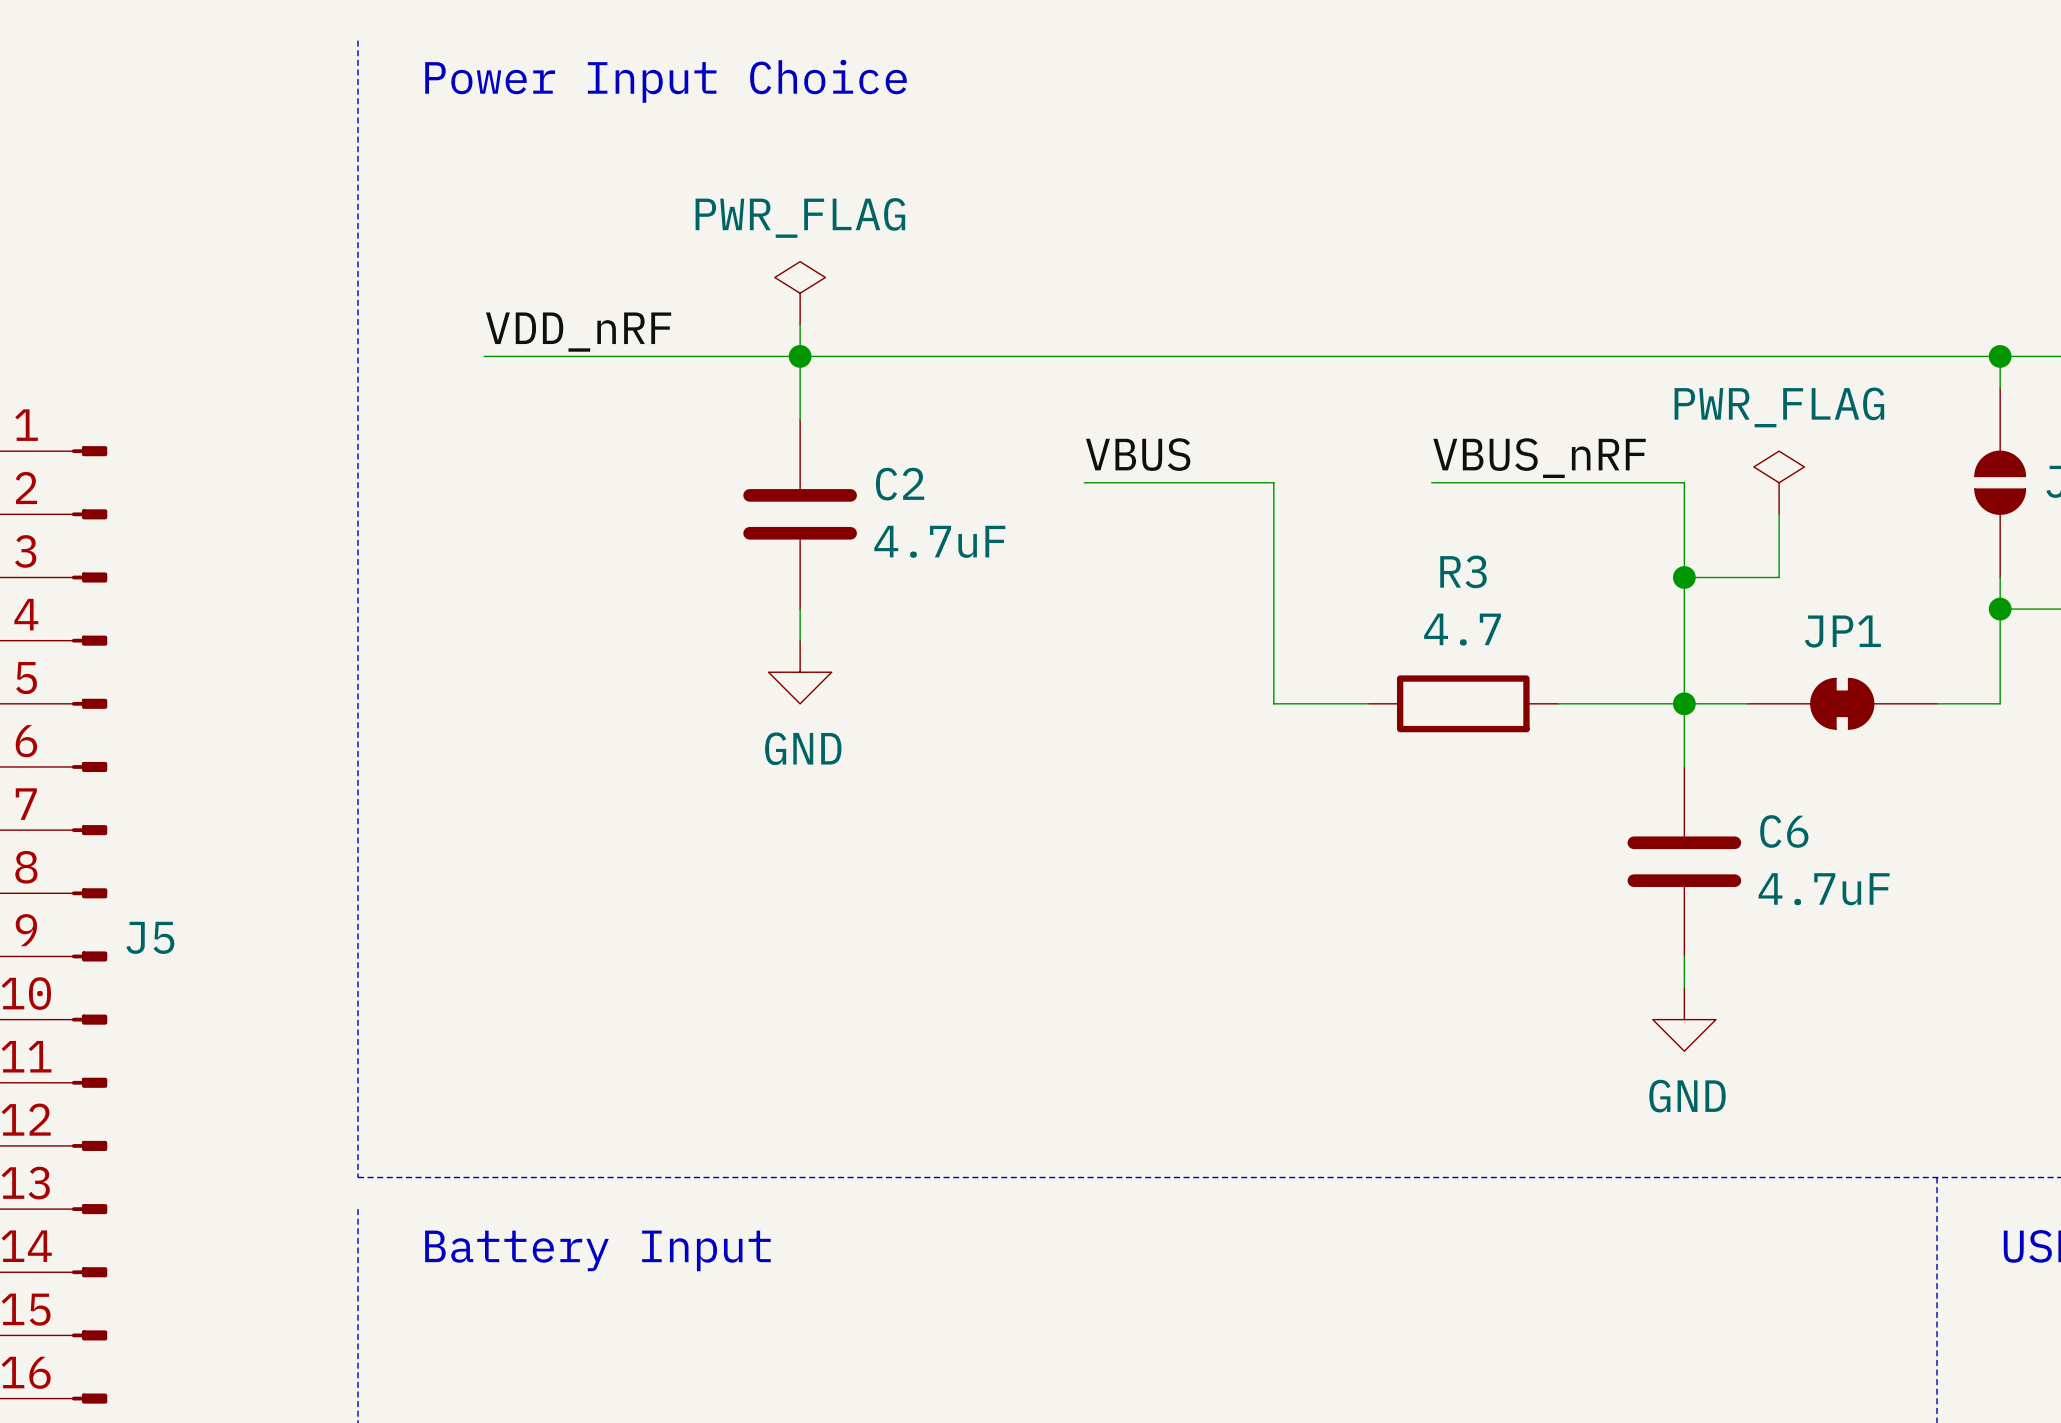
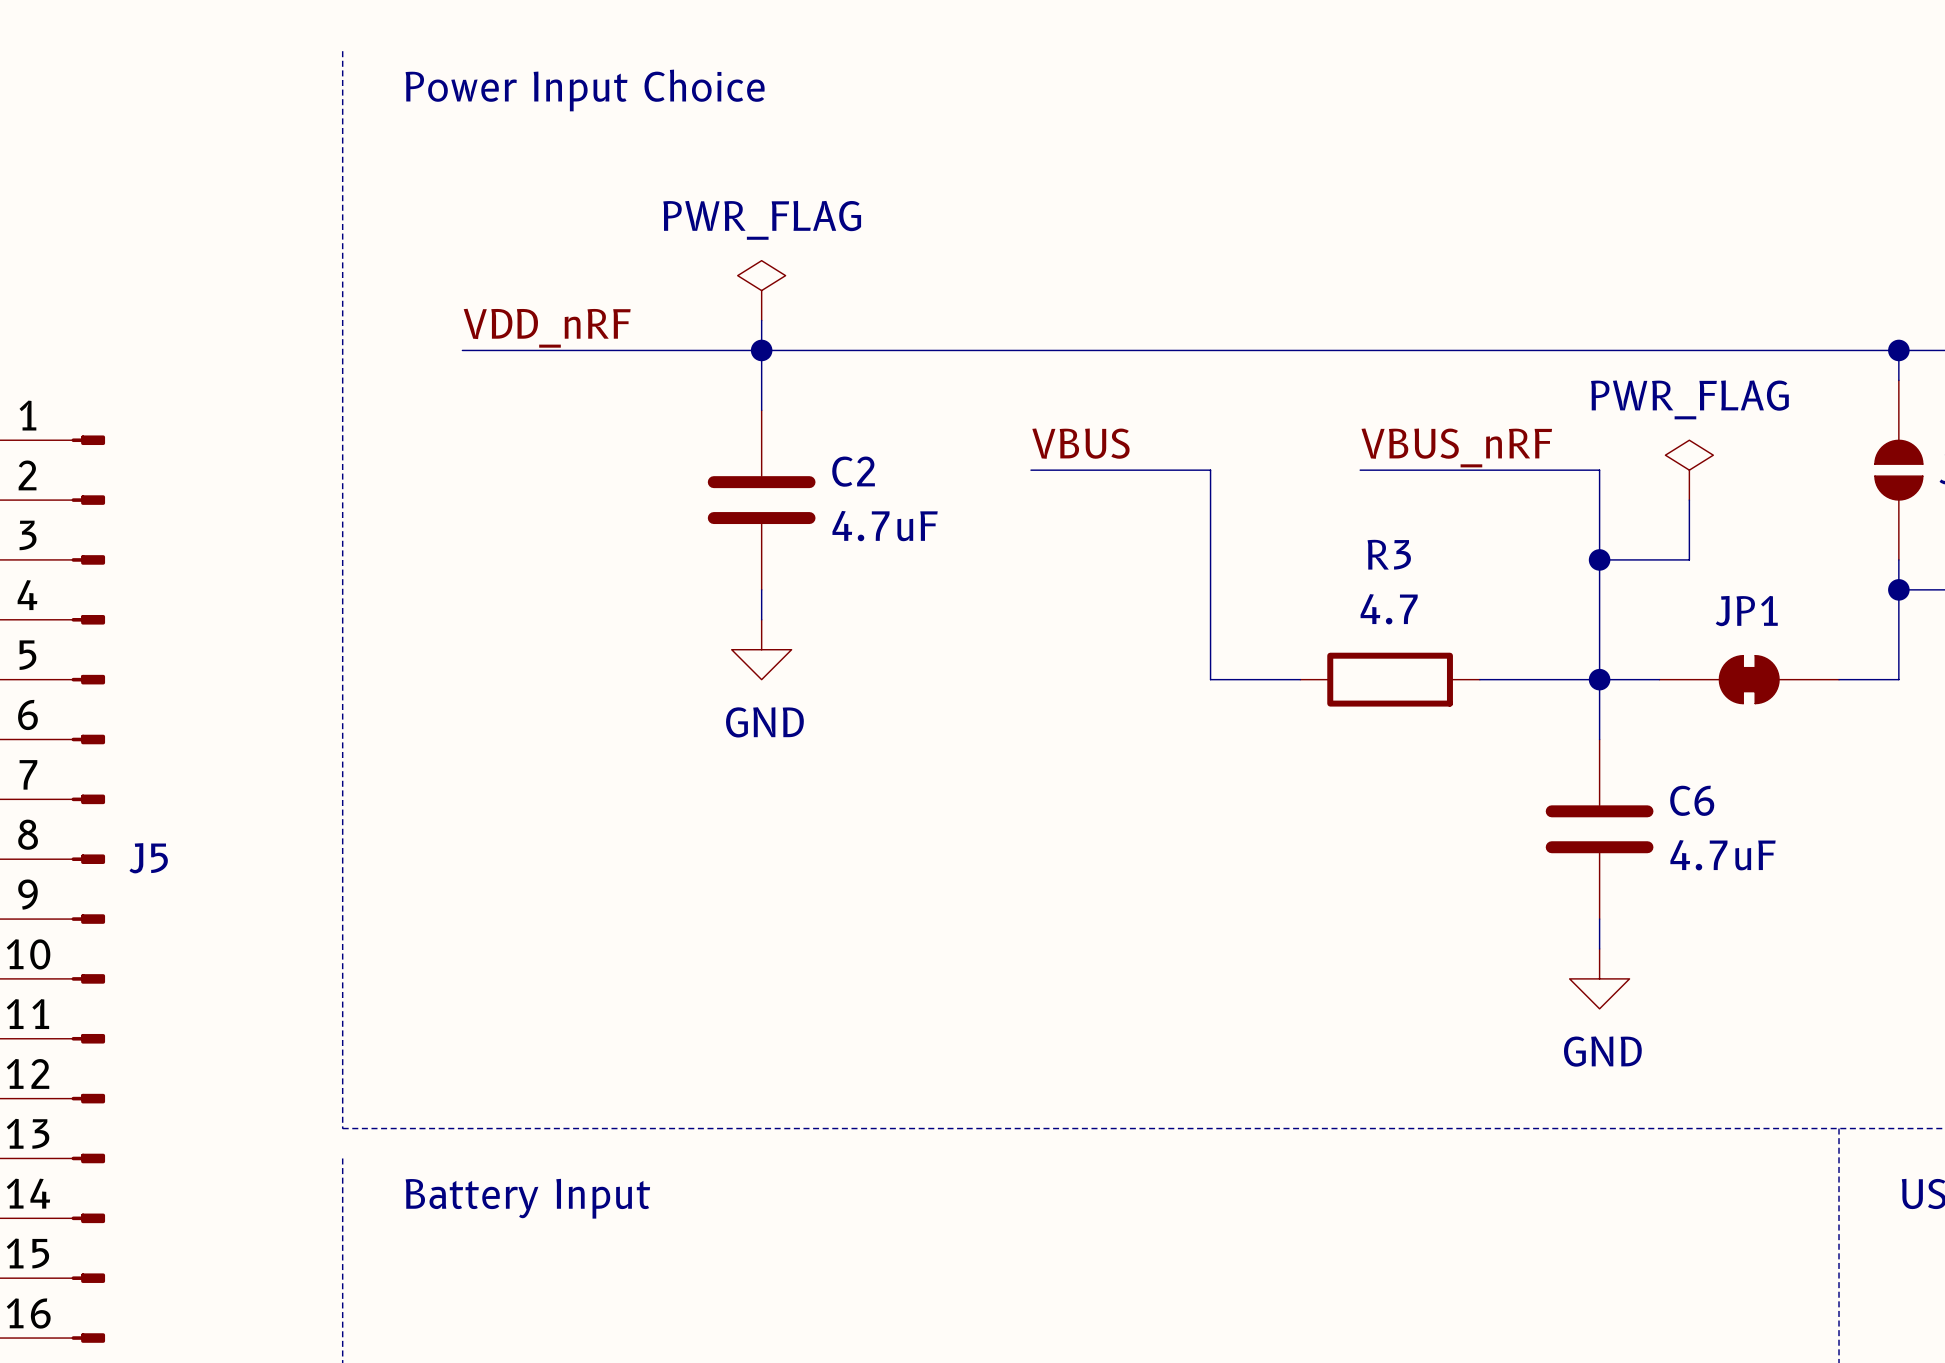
J5 name position: J5 (150, 937) -> J5 (148, 858)

